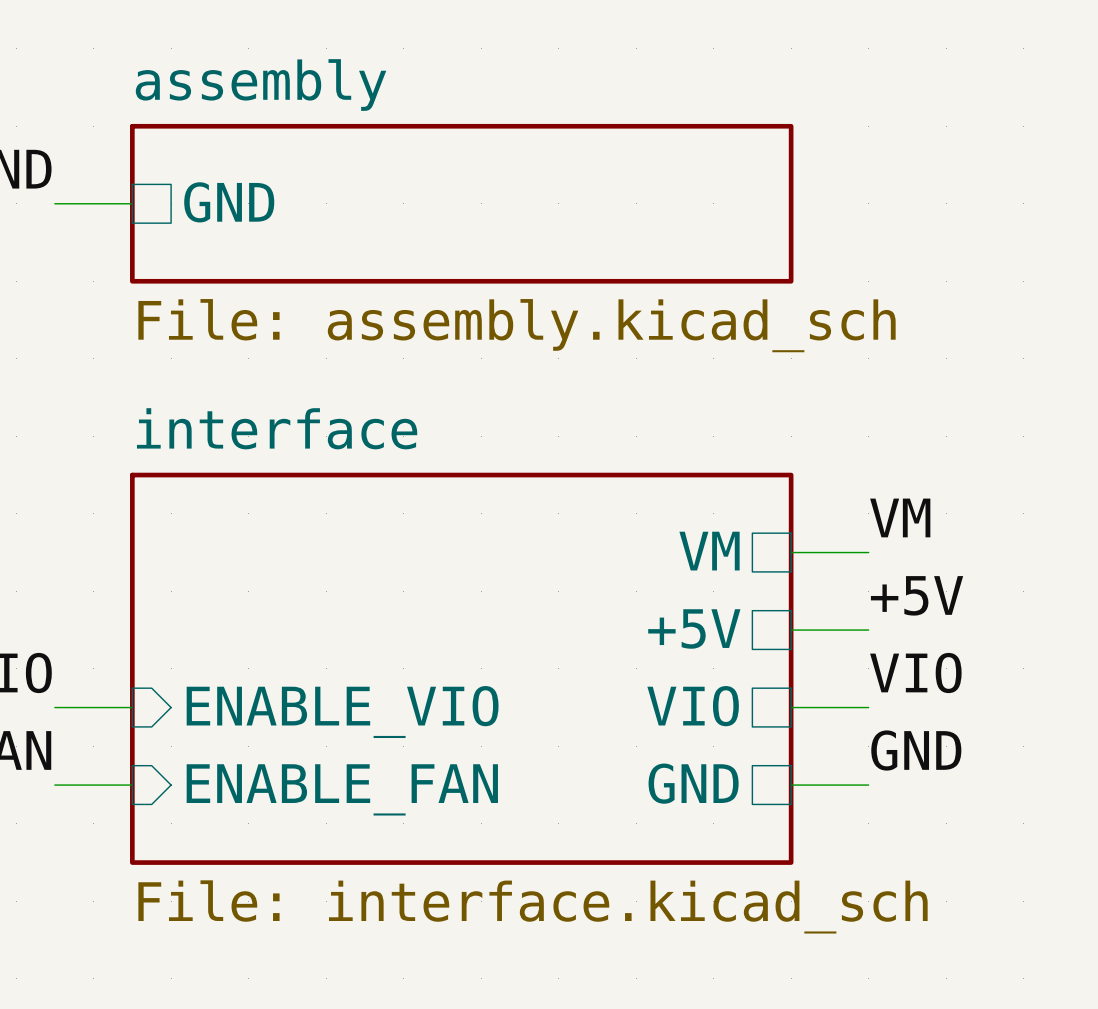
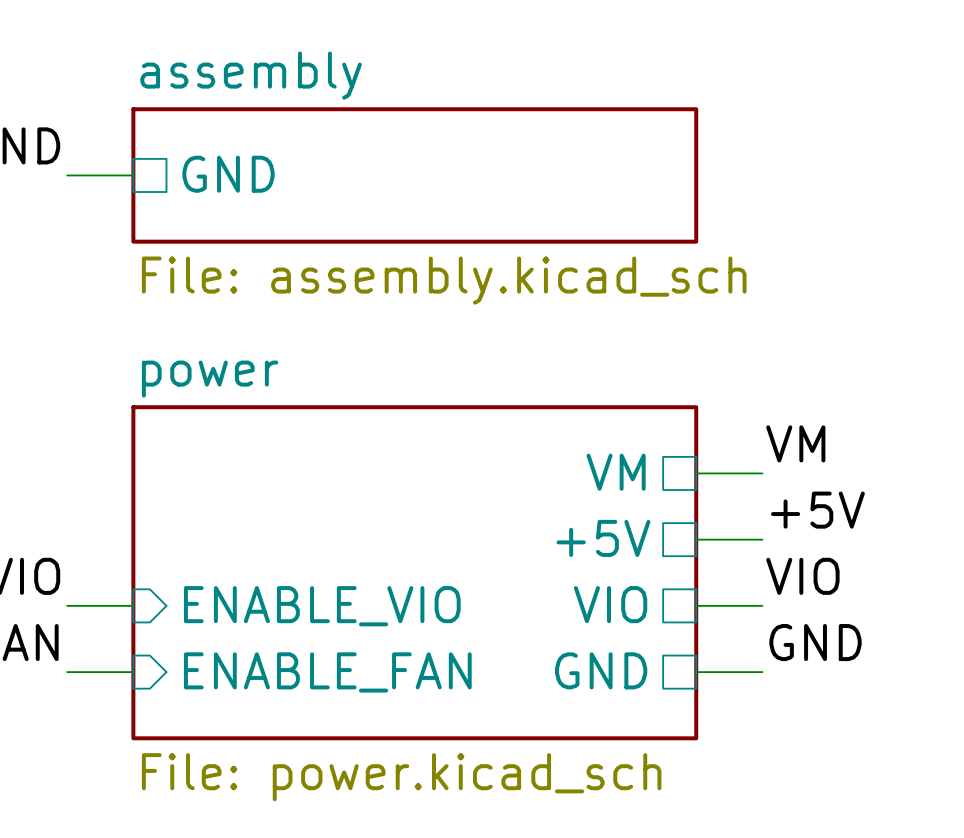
sheet interface name: interface (277, 428) -> power (210, 379)
sheet interface value: File: interface.kicad_sch (533, 906) -> File: power.kicad_sch (401, 777)

